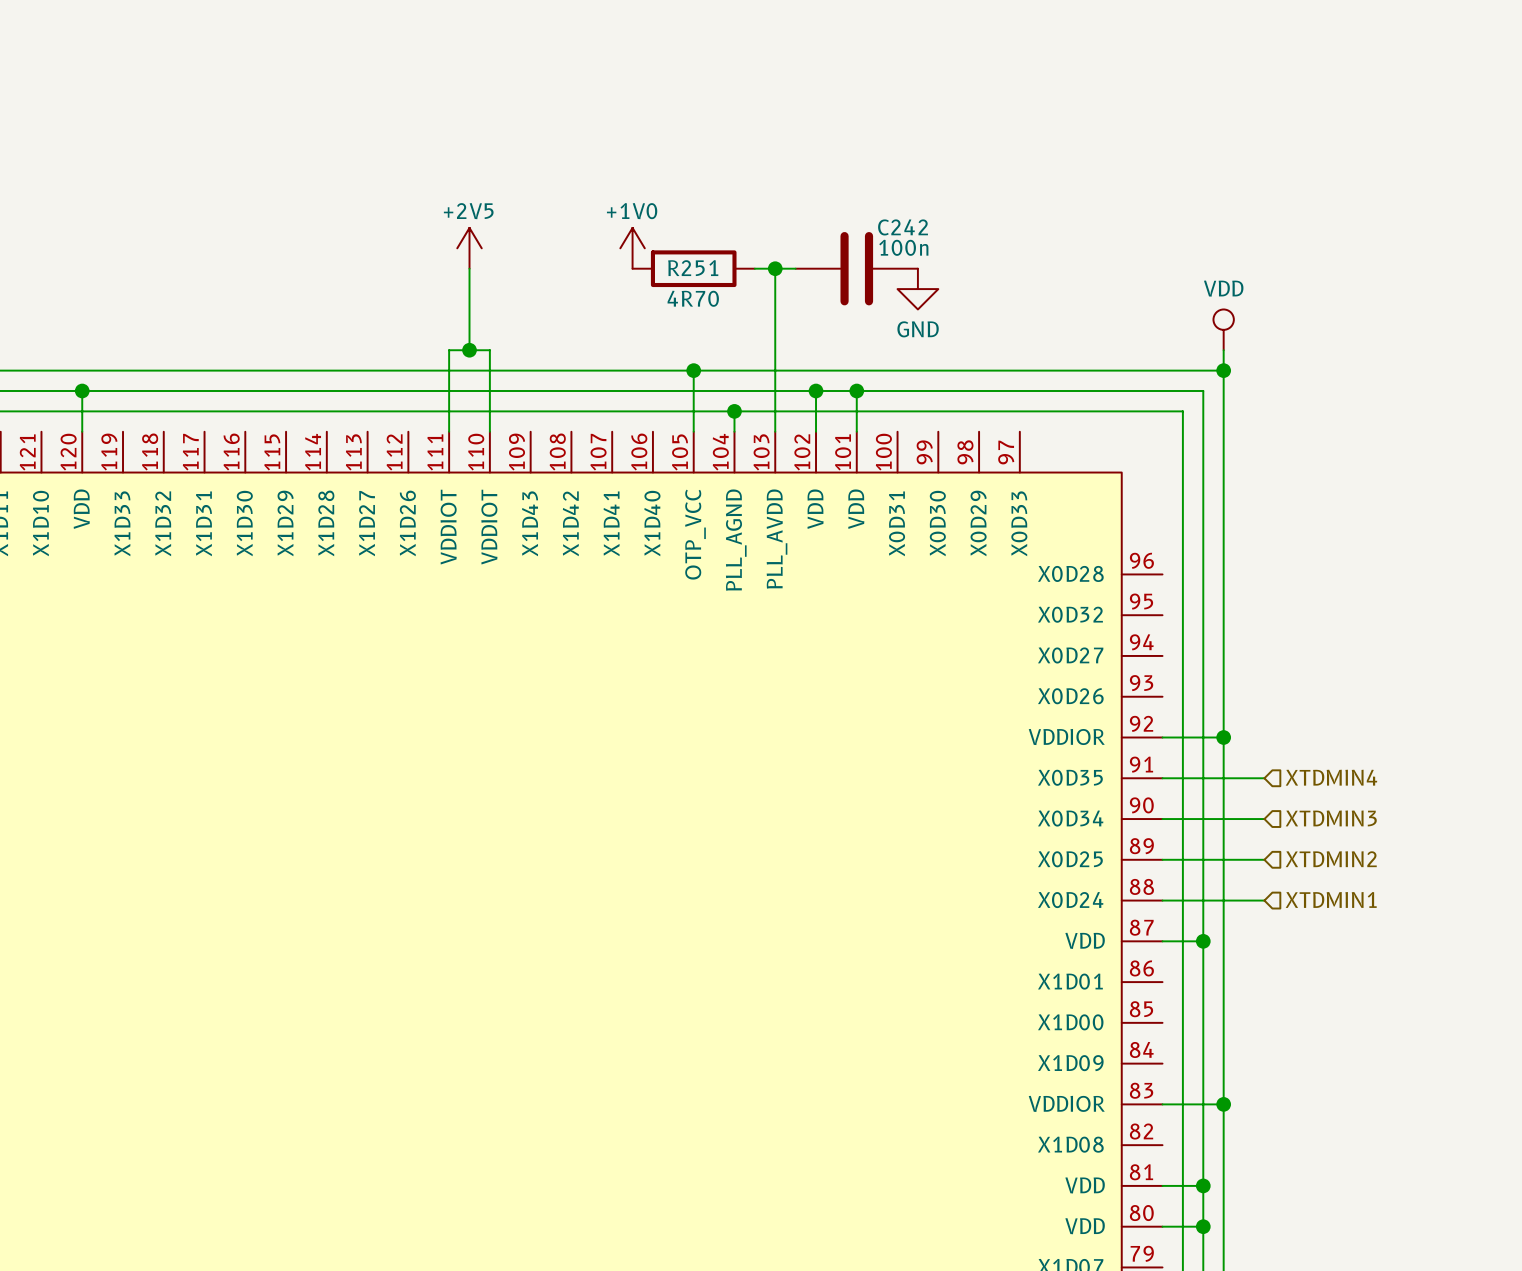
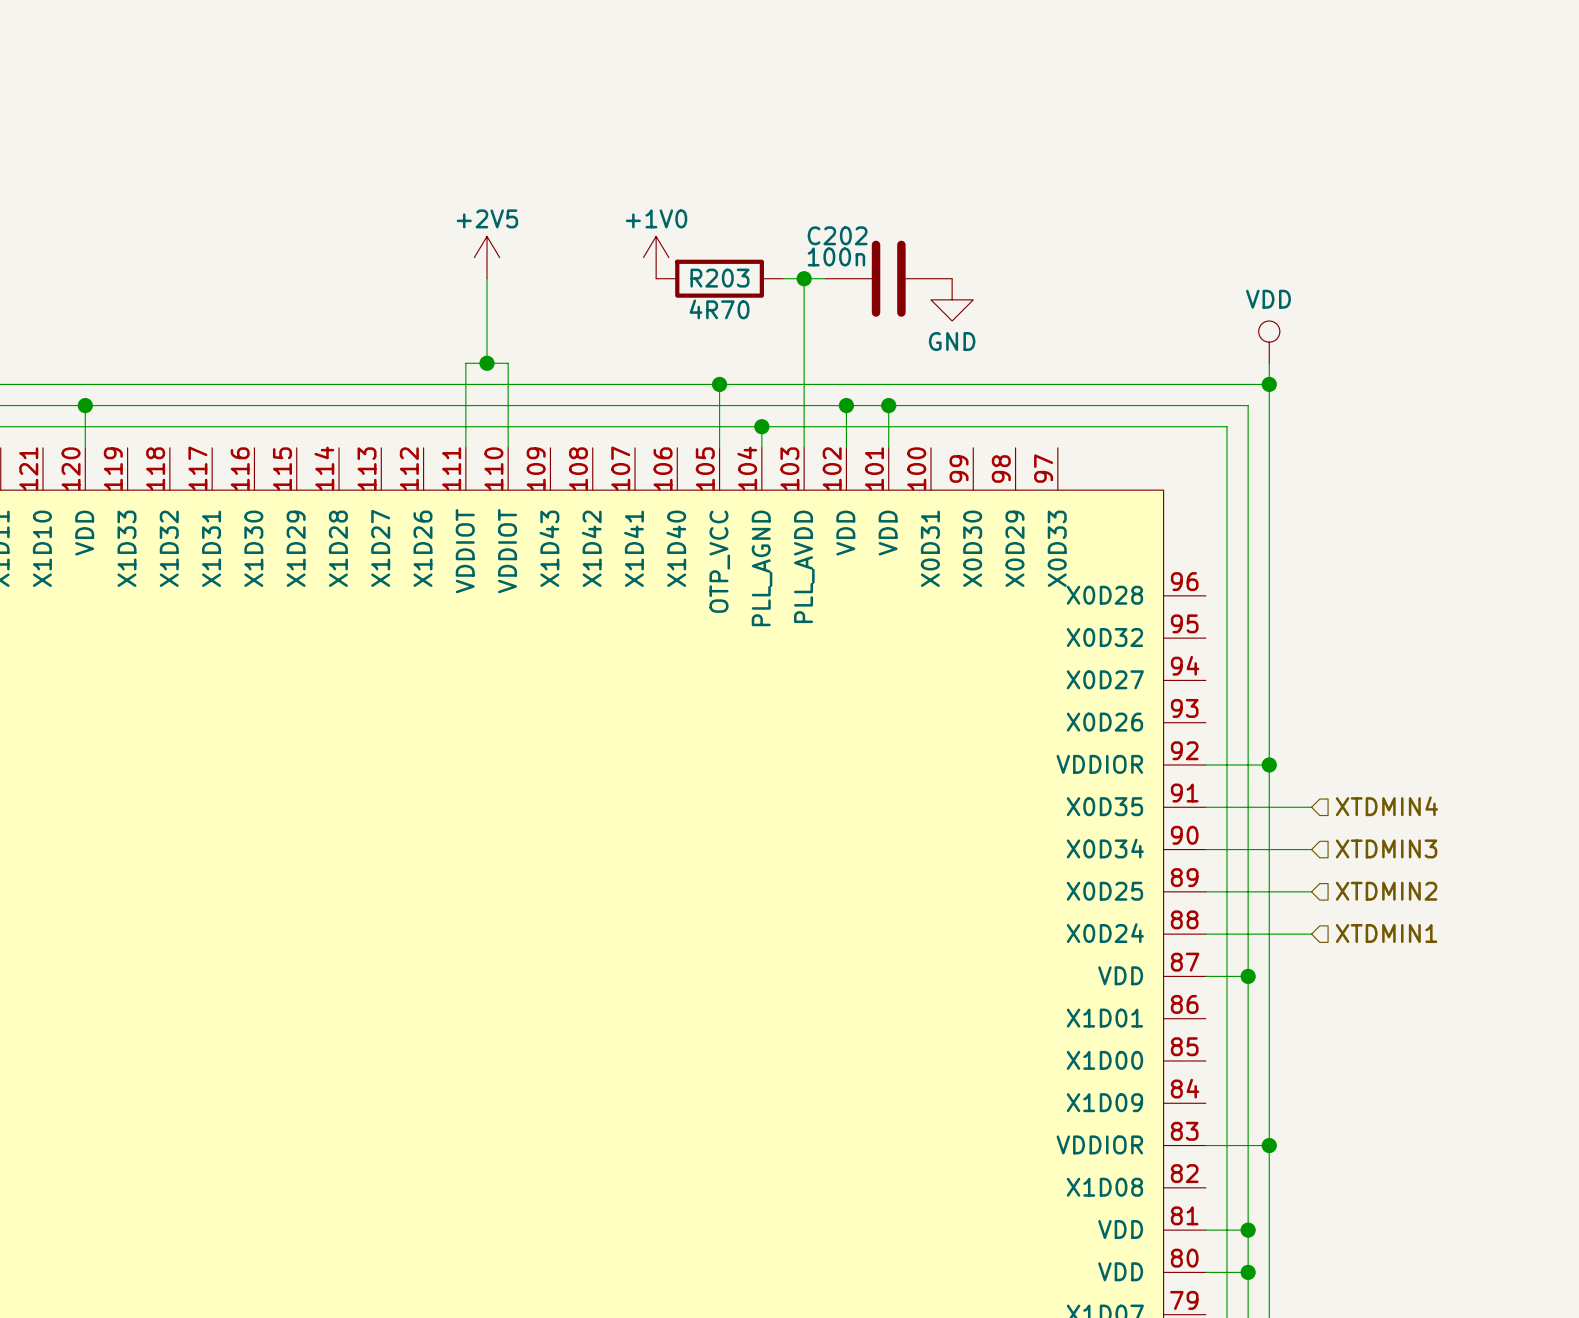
C242 name: C242 (903, 227) -> C202 (837, 235)
C242 text: none -> 100n (836, 256)
C242 value: 100n (903, 247) -> none
R251 name: R251 (693, 268) -> R203 (719, 278)

